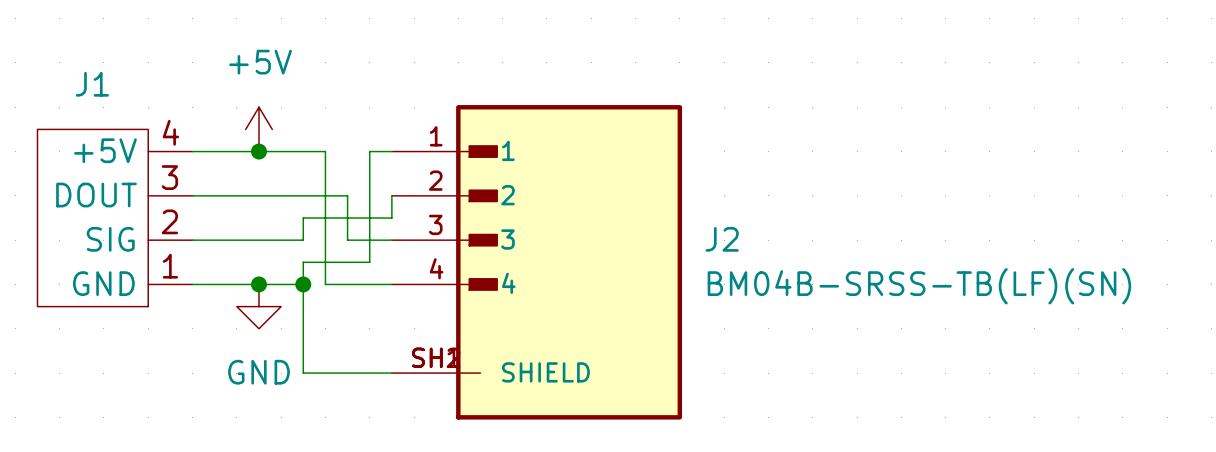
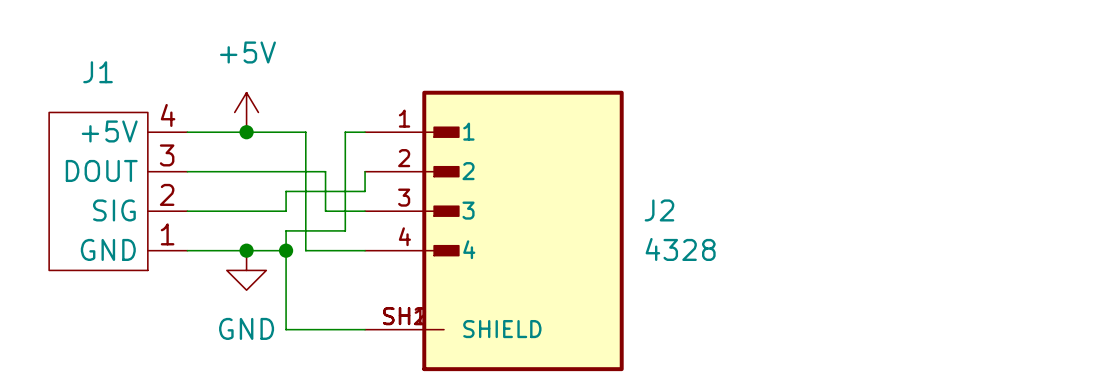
J2 value: BM04B-SRSS-TB(LF)(SN) (919, 286) -> 4328 (680, 249)

